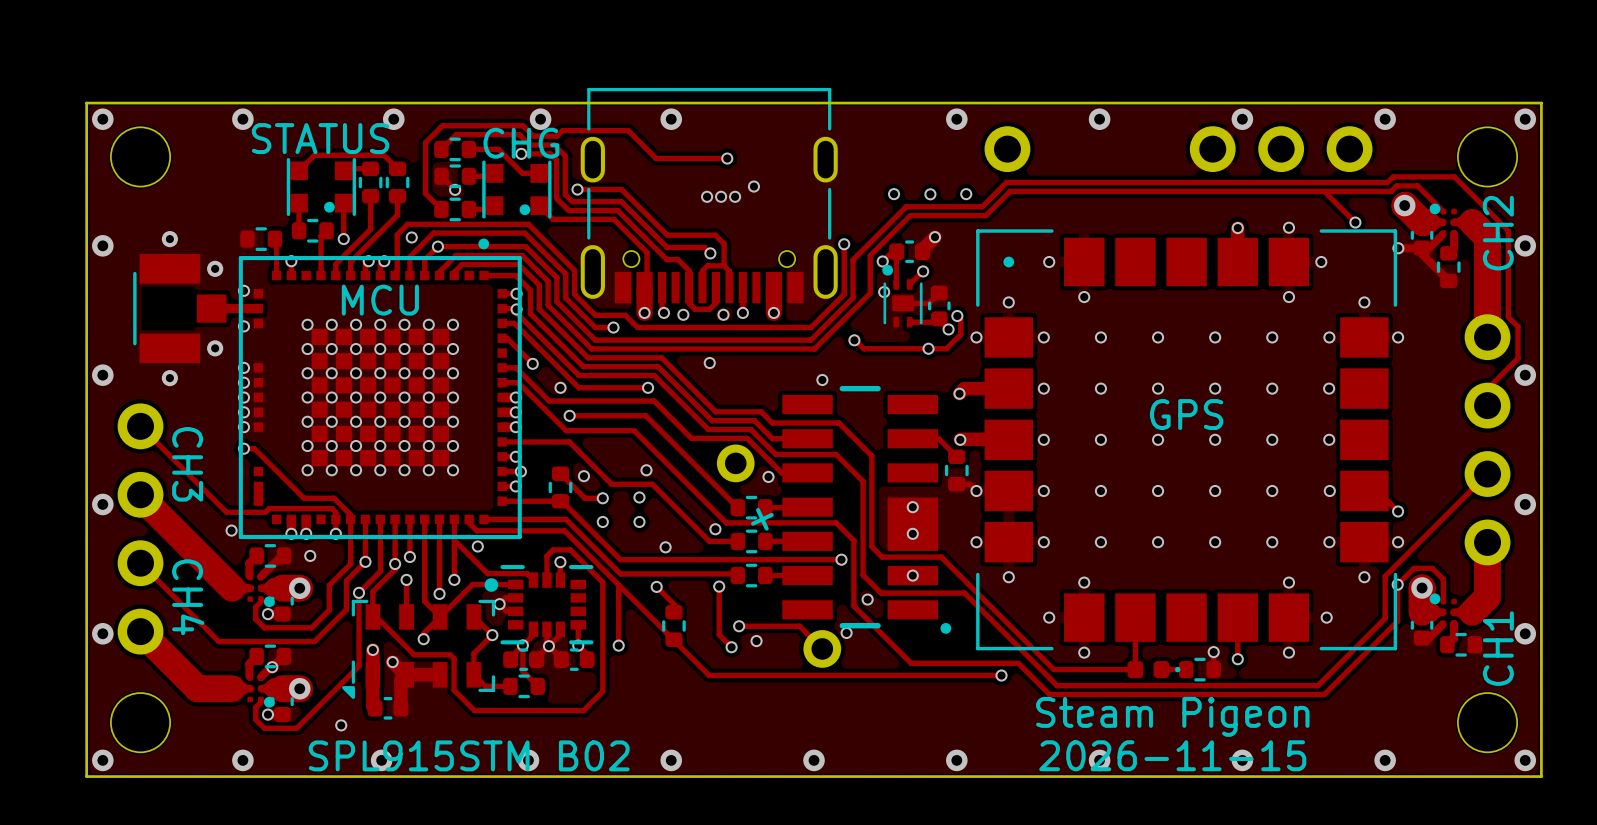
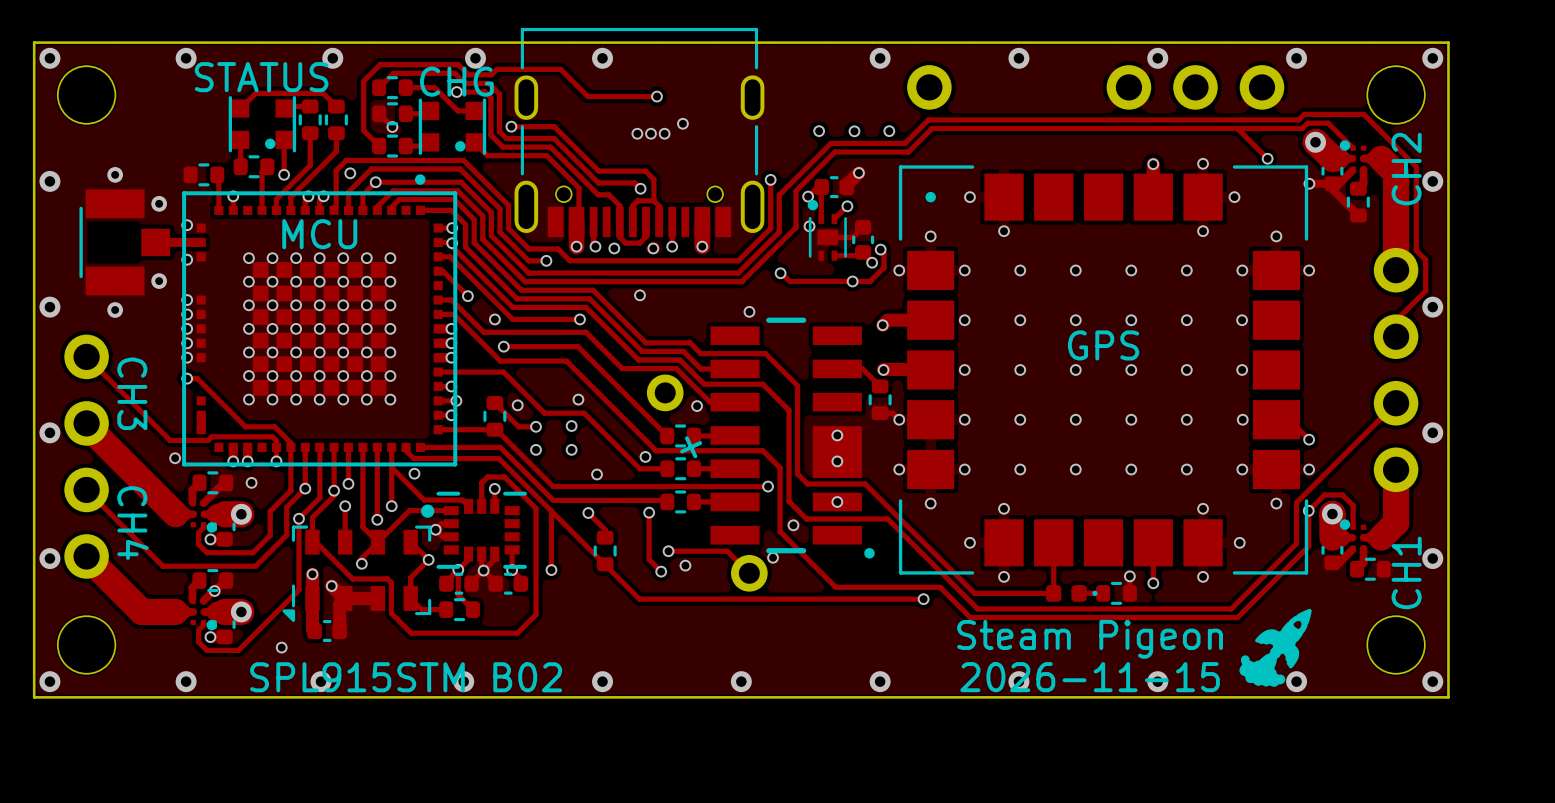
drawing: none -> [1239, 608, 1312, 687]

